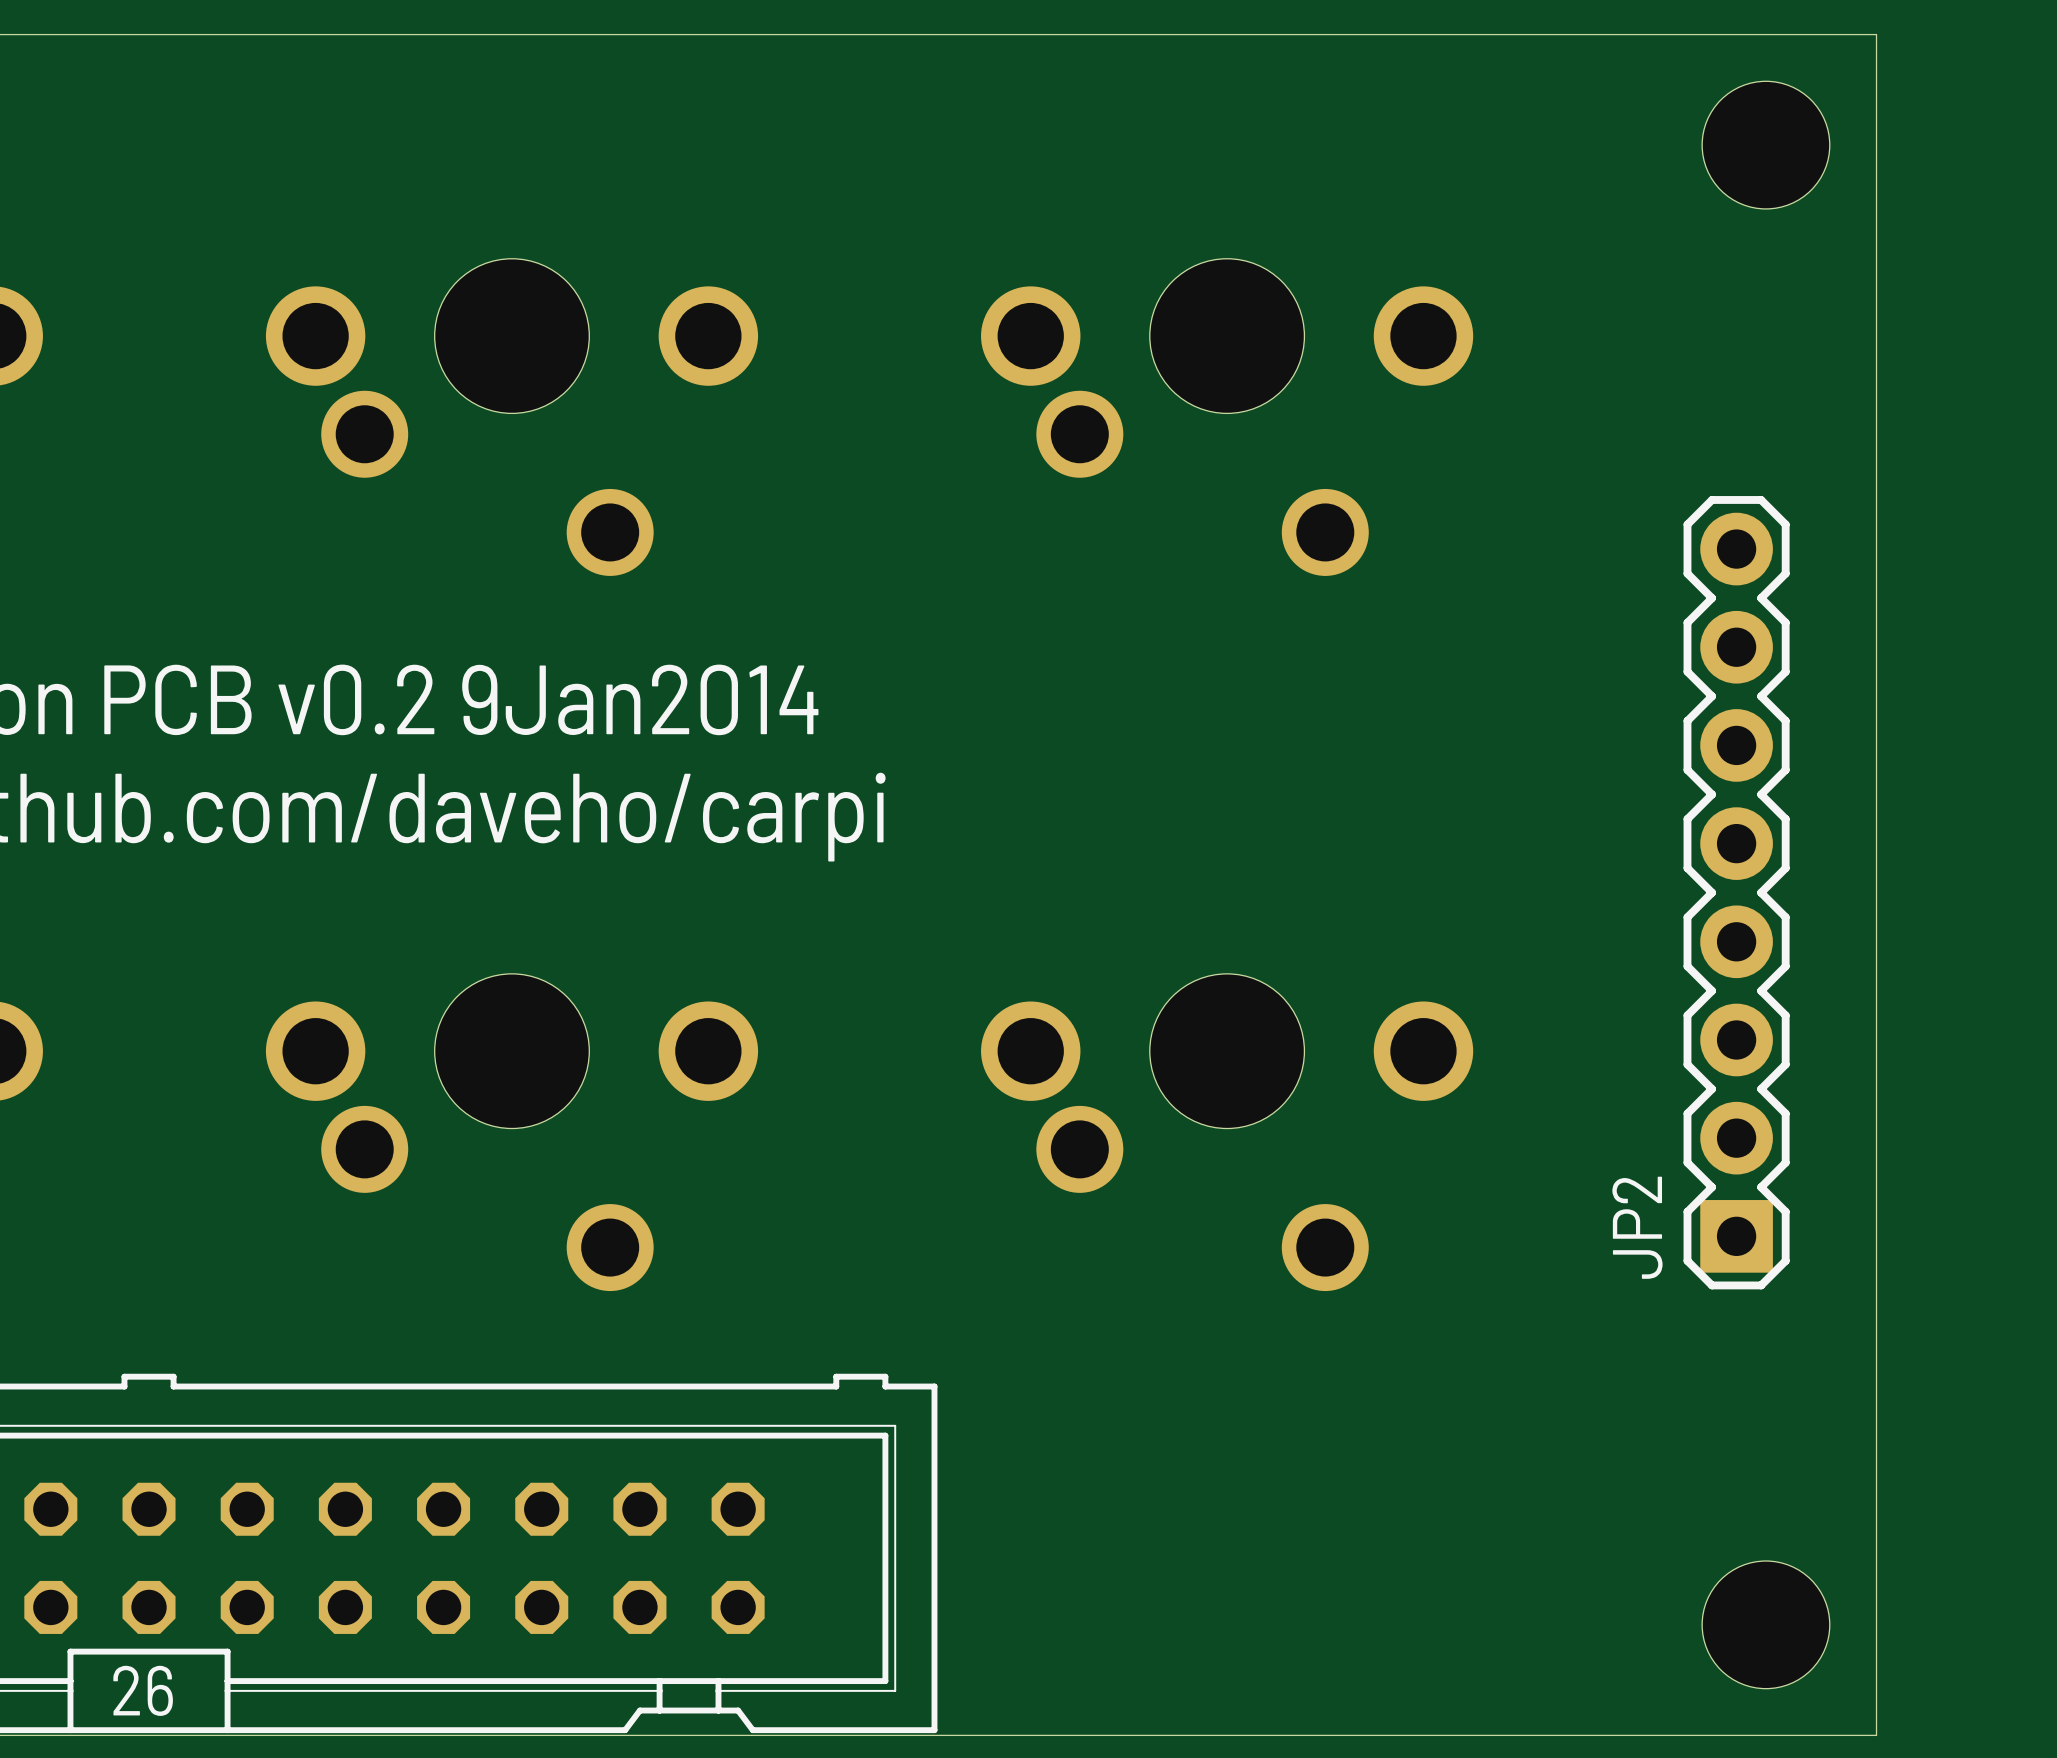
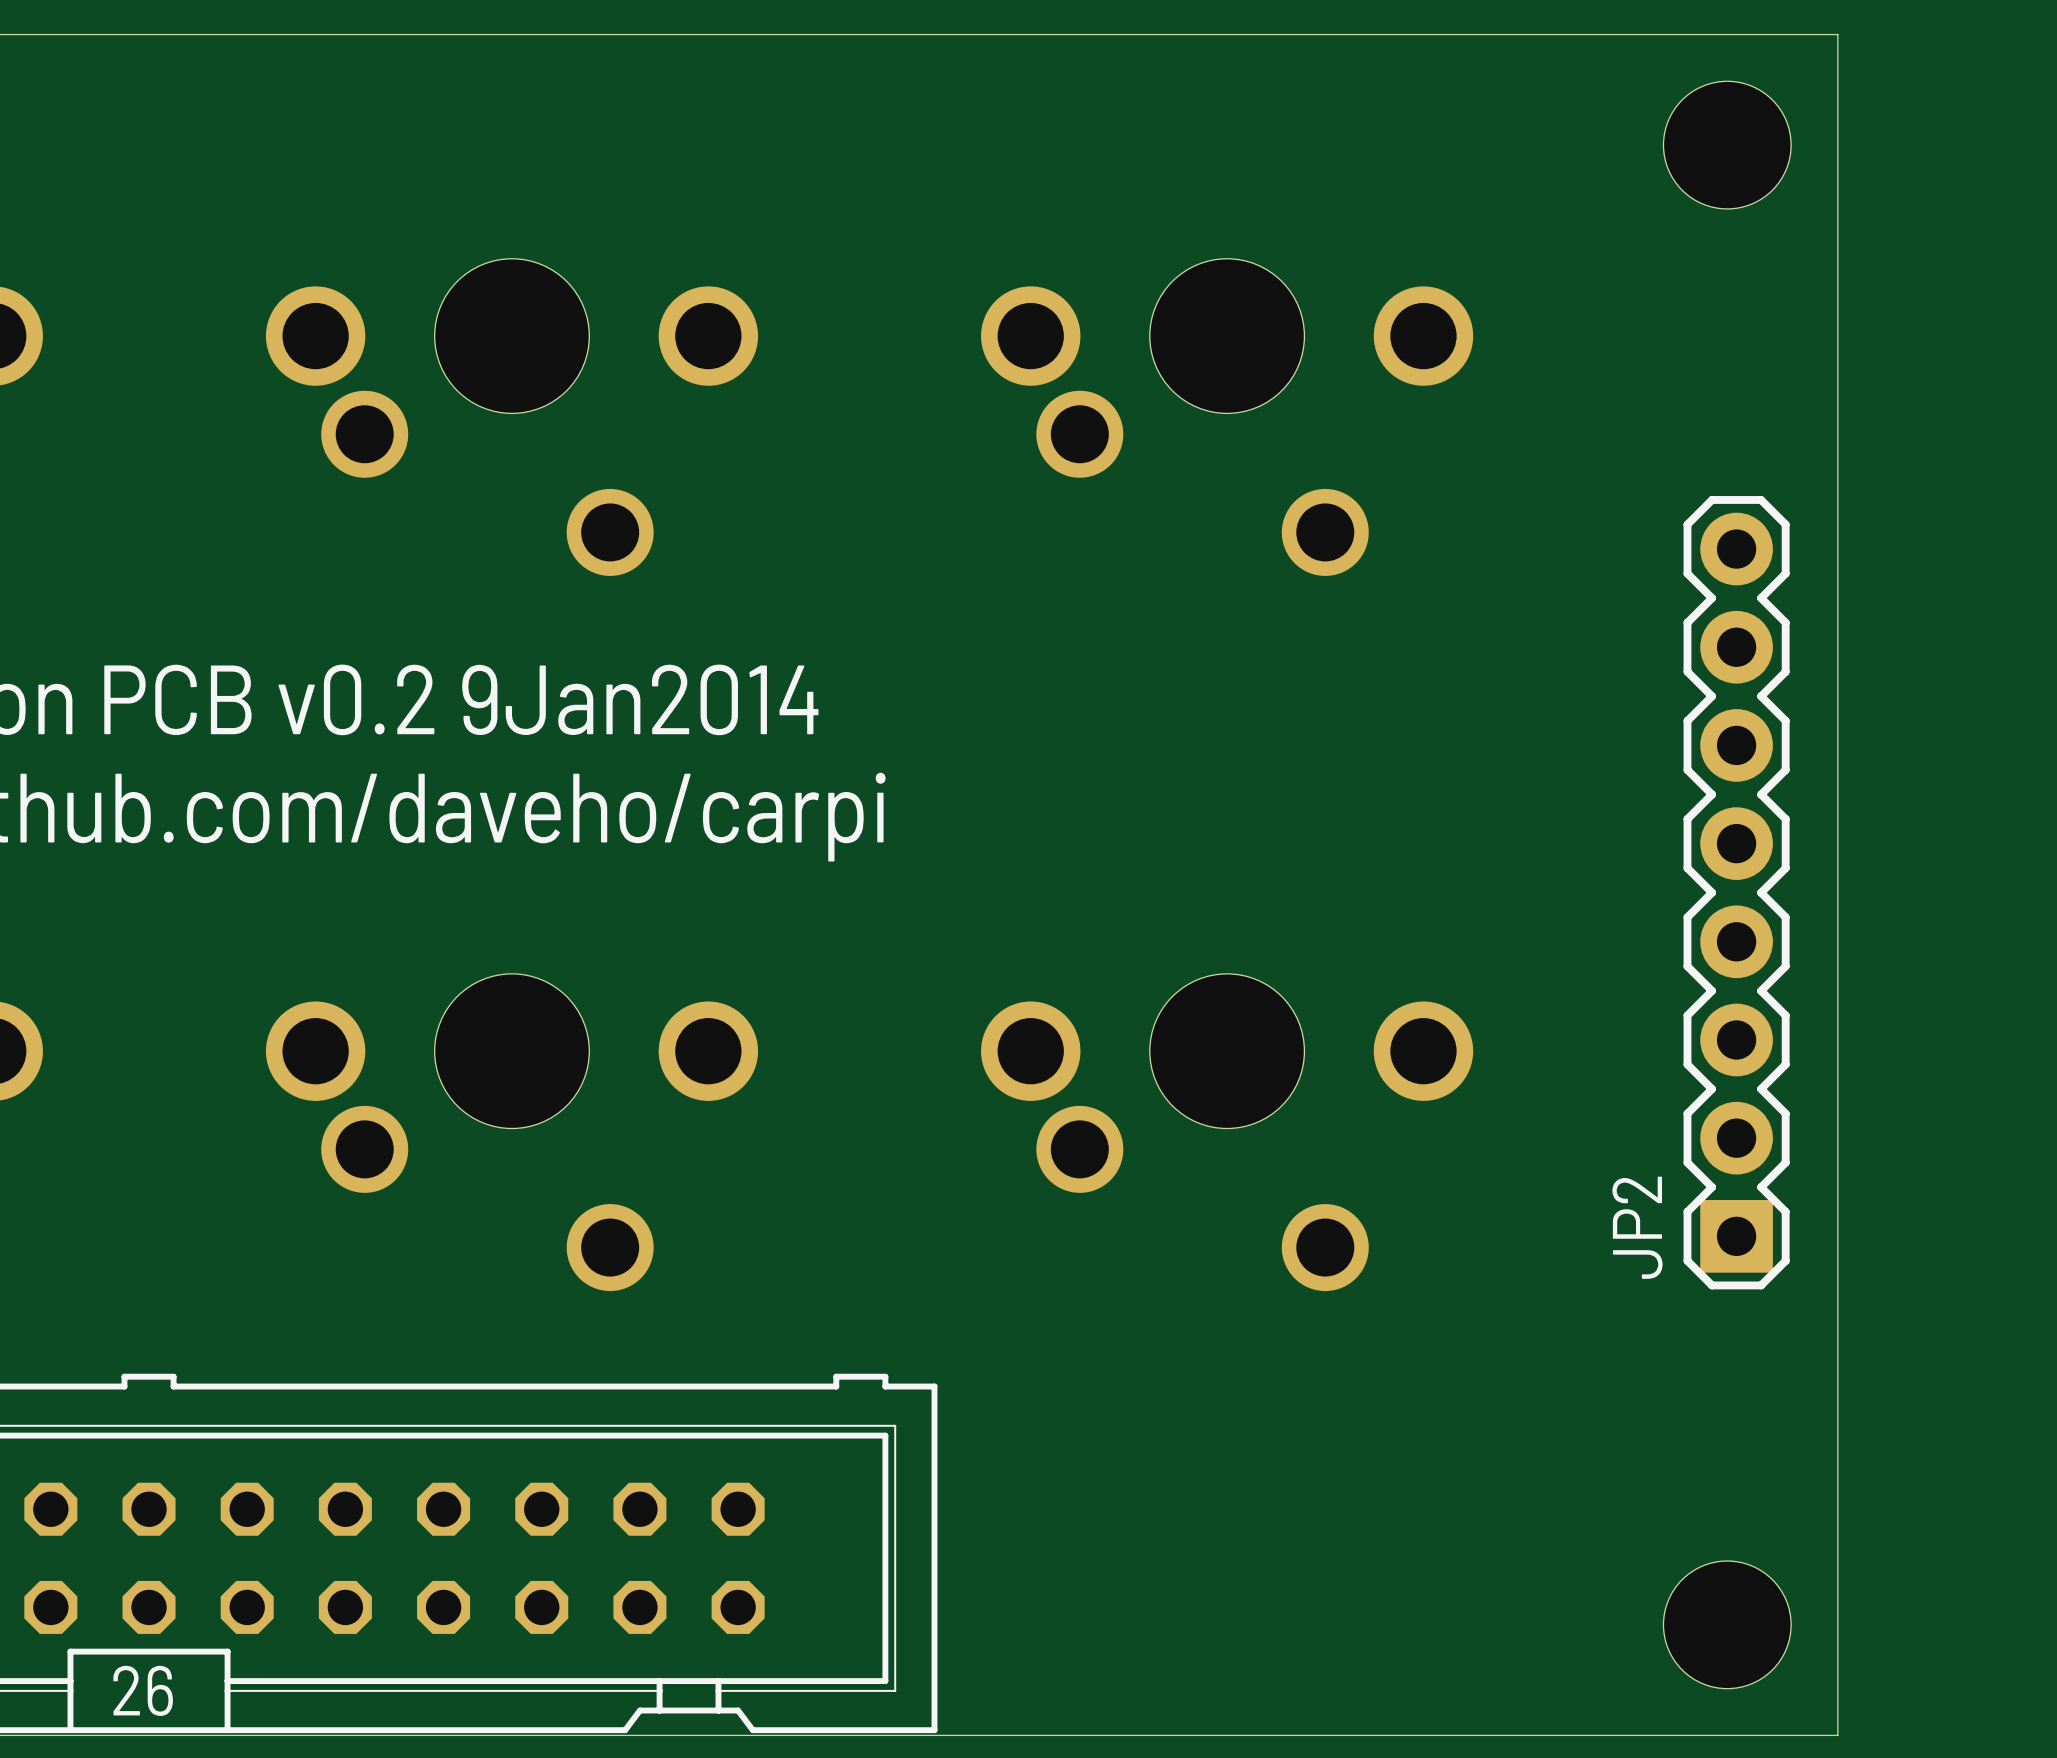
board edge: (1837, 34) (1876, 34) (1876, 1735) (1837, 1735) -> (1837, 34) (1837, 1735)
part position: (1765, 145) -> (1727, 145)
part position: (1765, 1624) -> (1727, 1624)

